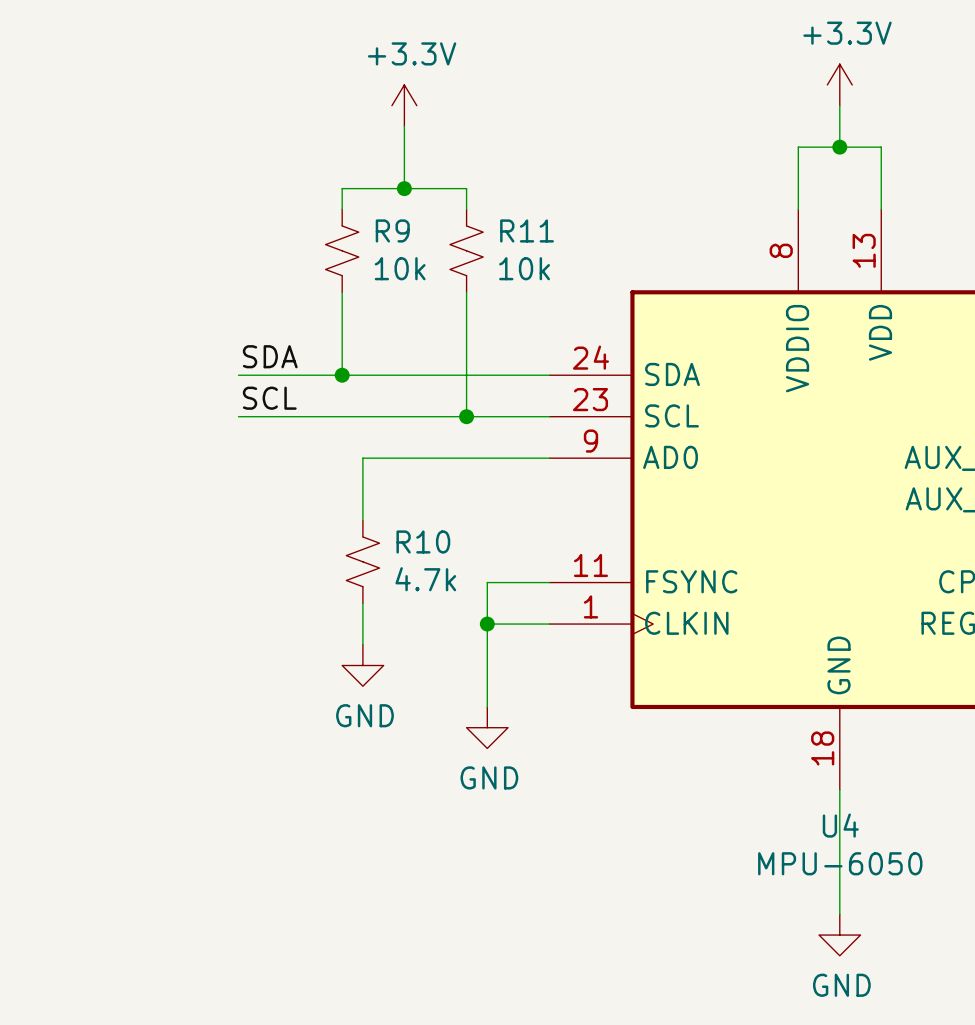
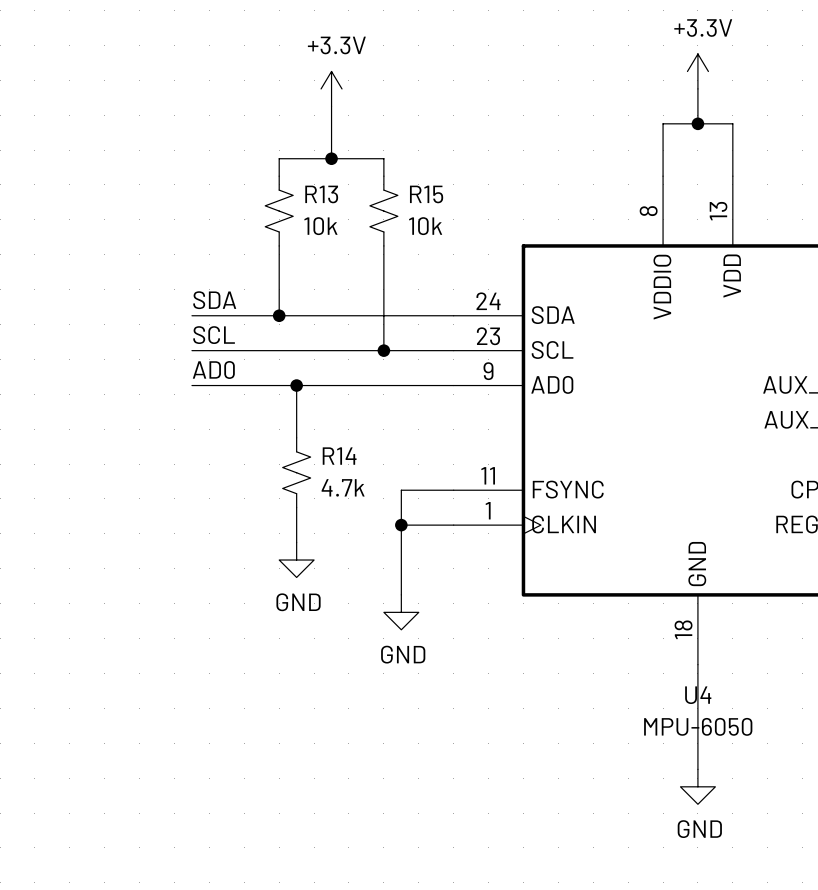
R9 name: R9 (392, 230) -> R13 (321, 194)
R11 name: R11 (527, 230) -> R15 (426, 194)
label: none -> AD0 (213, 369)
wire: none -> (191, 385) (296, 385)
junction: none -> (296, 385)
R10 name: R10 (423, 541) -> R14 (339, 456)

